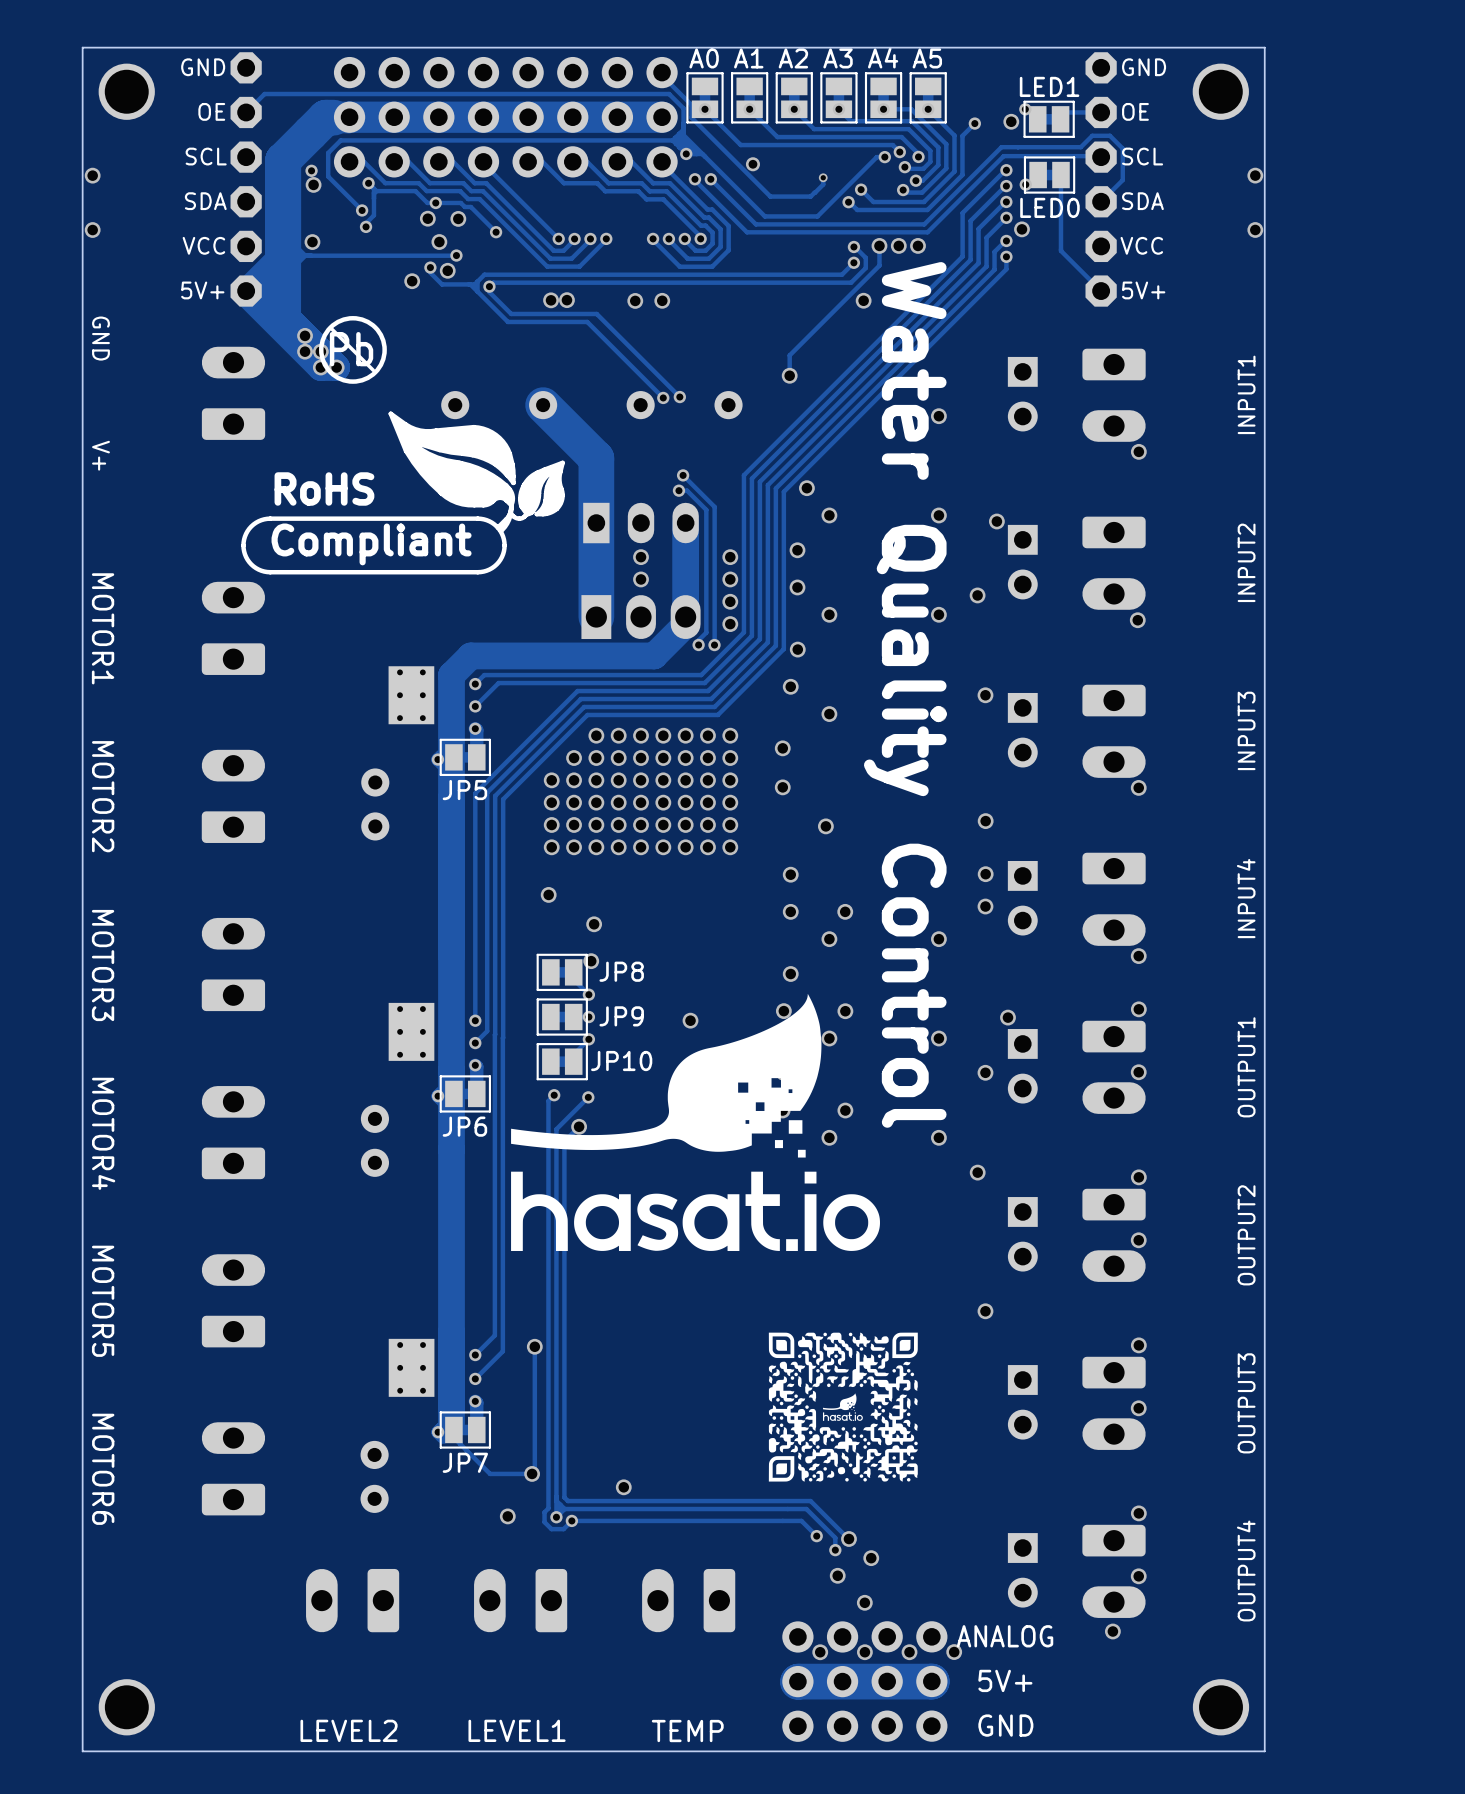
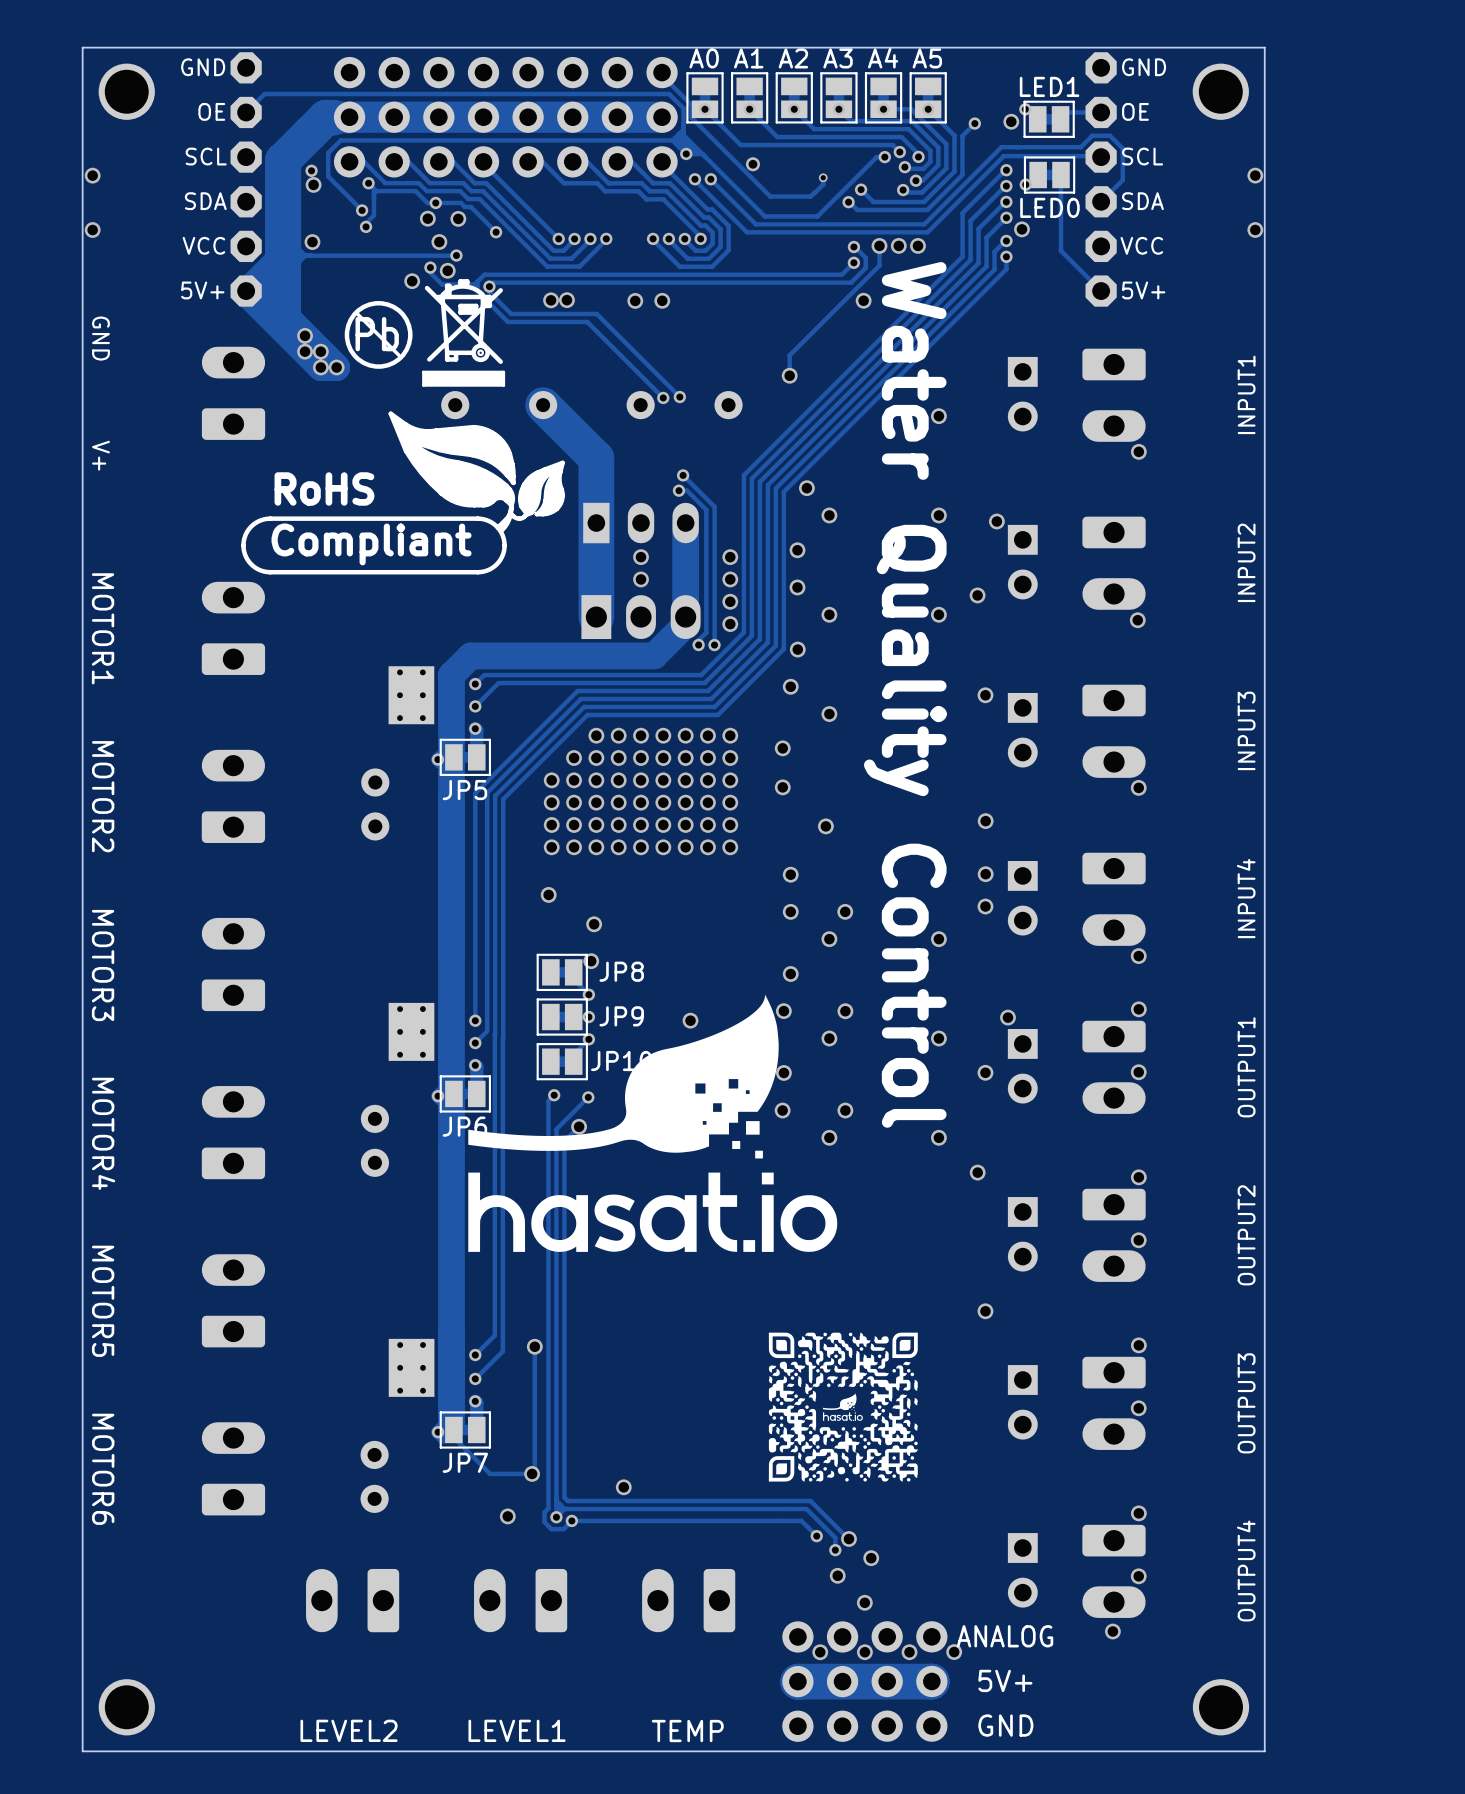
drawing: none -> [422, 279, 506, 387]
drawing position: (352, 349) -> (378, 334)
drawing position: (695, 1122) -> (652, 1123)

